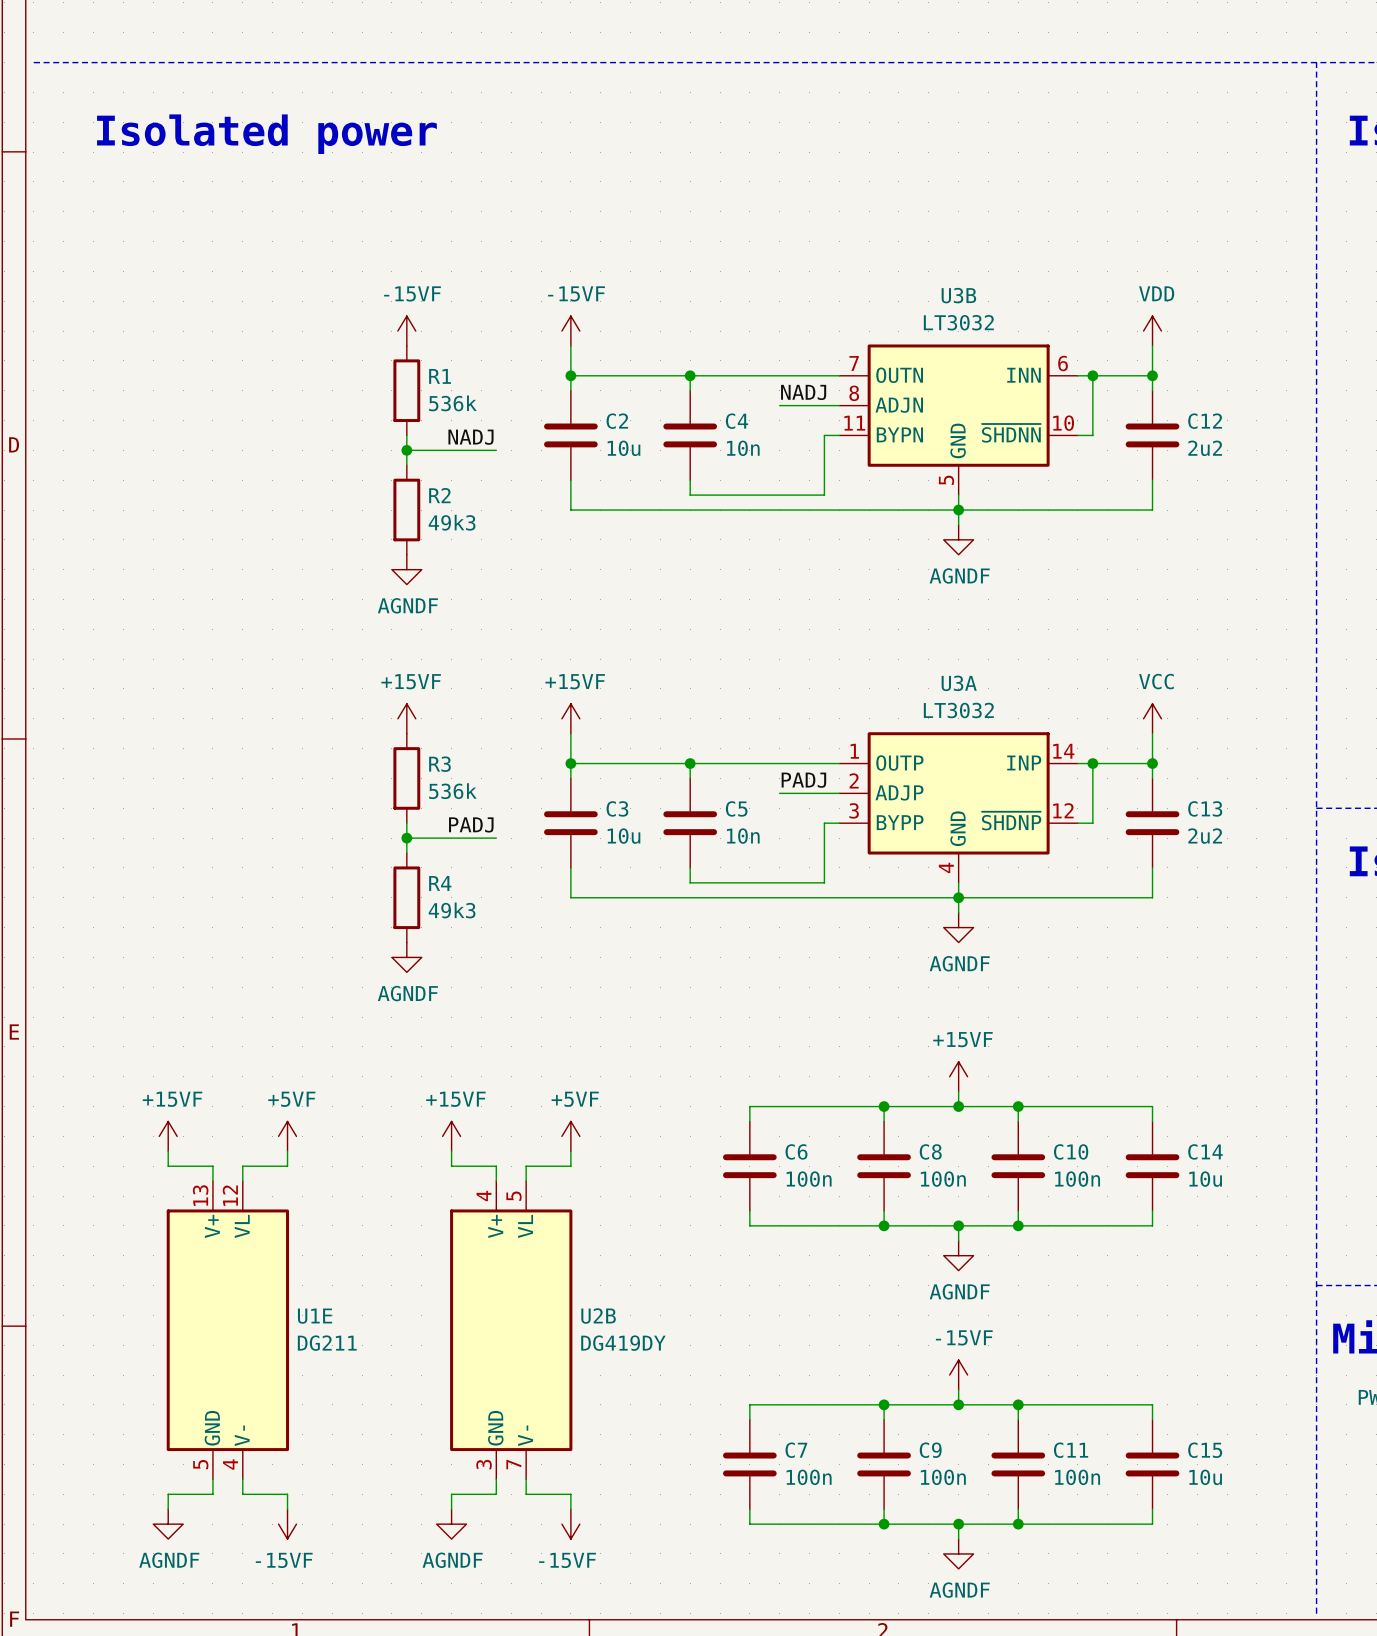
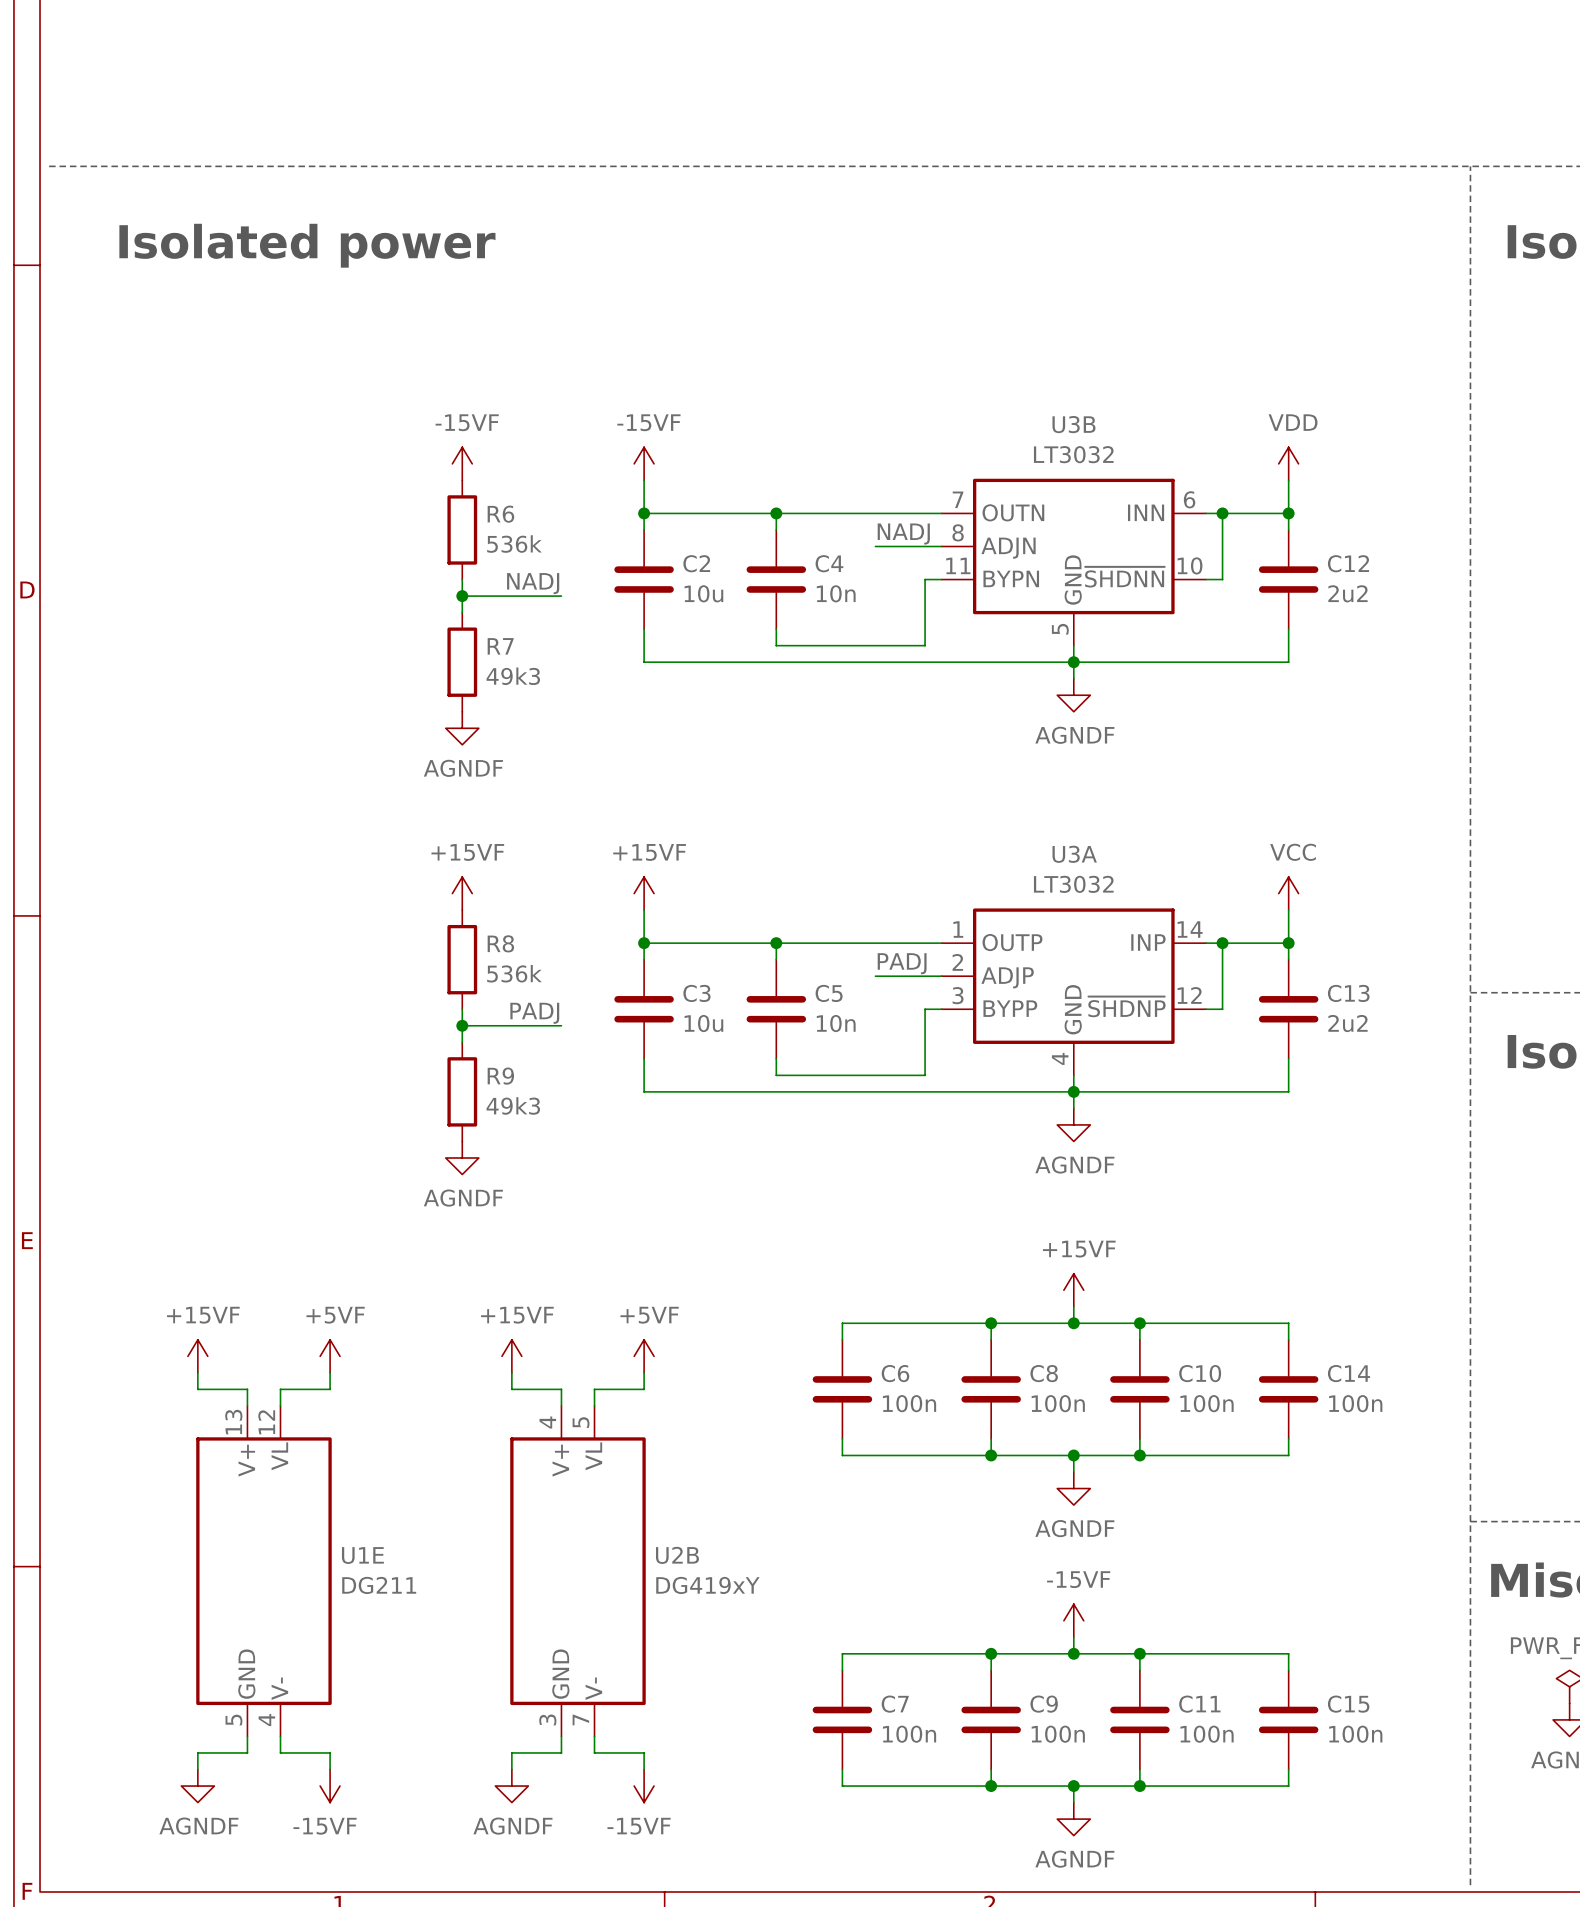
R1 name: R1 (440, 376) -> R6 (500, 514)
R2 name: R2 (439, 495) -> R7 (500, 646)
R3 name: R3 (439, 764) -> R8 (500, 943)
R4 name: R4 (440, 883) -> R9 (500, 1076)
C14 value: 10u (1205, 1179) -> 100n (1355, 1403)
U2B value: DG419DY (623, 1343) -> DG419xY (707, 1585)
C15 value: 10u (1205, 1477) -> 100n (1355, 1734)

